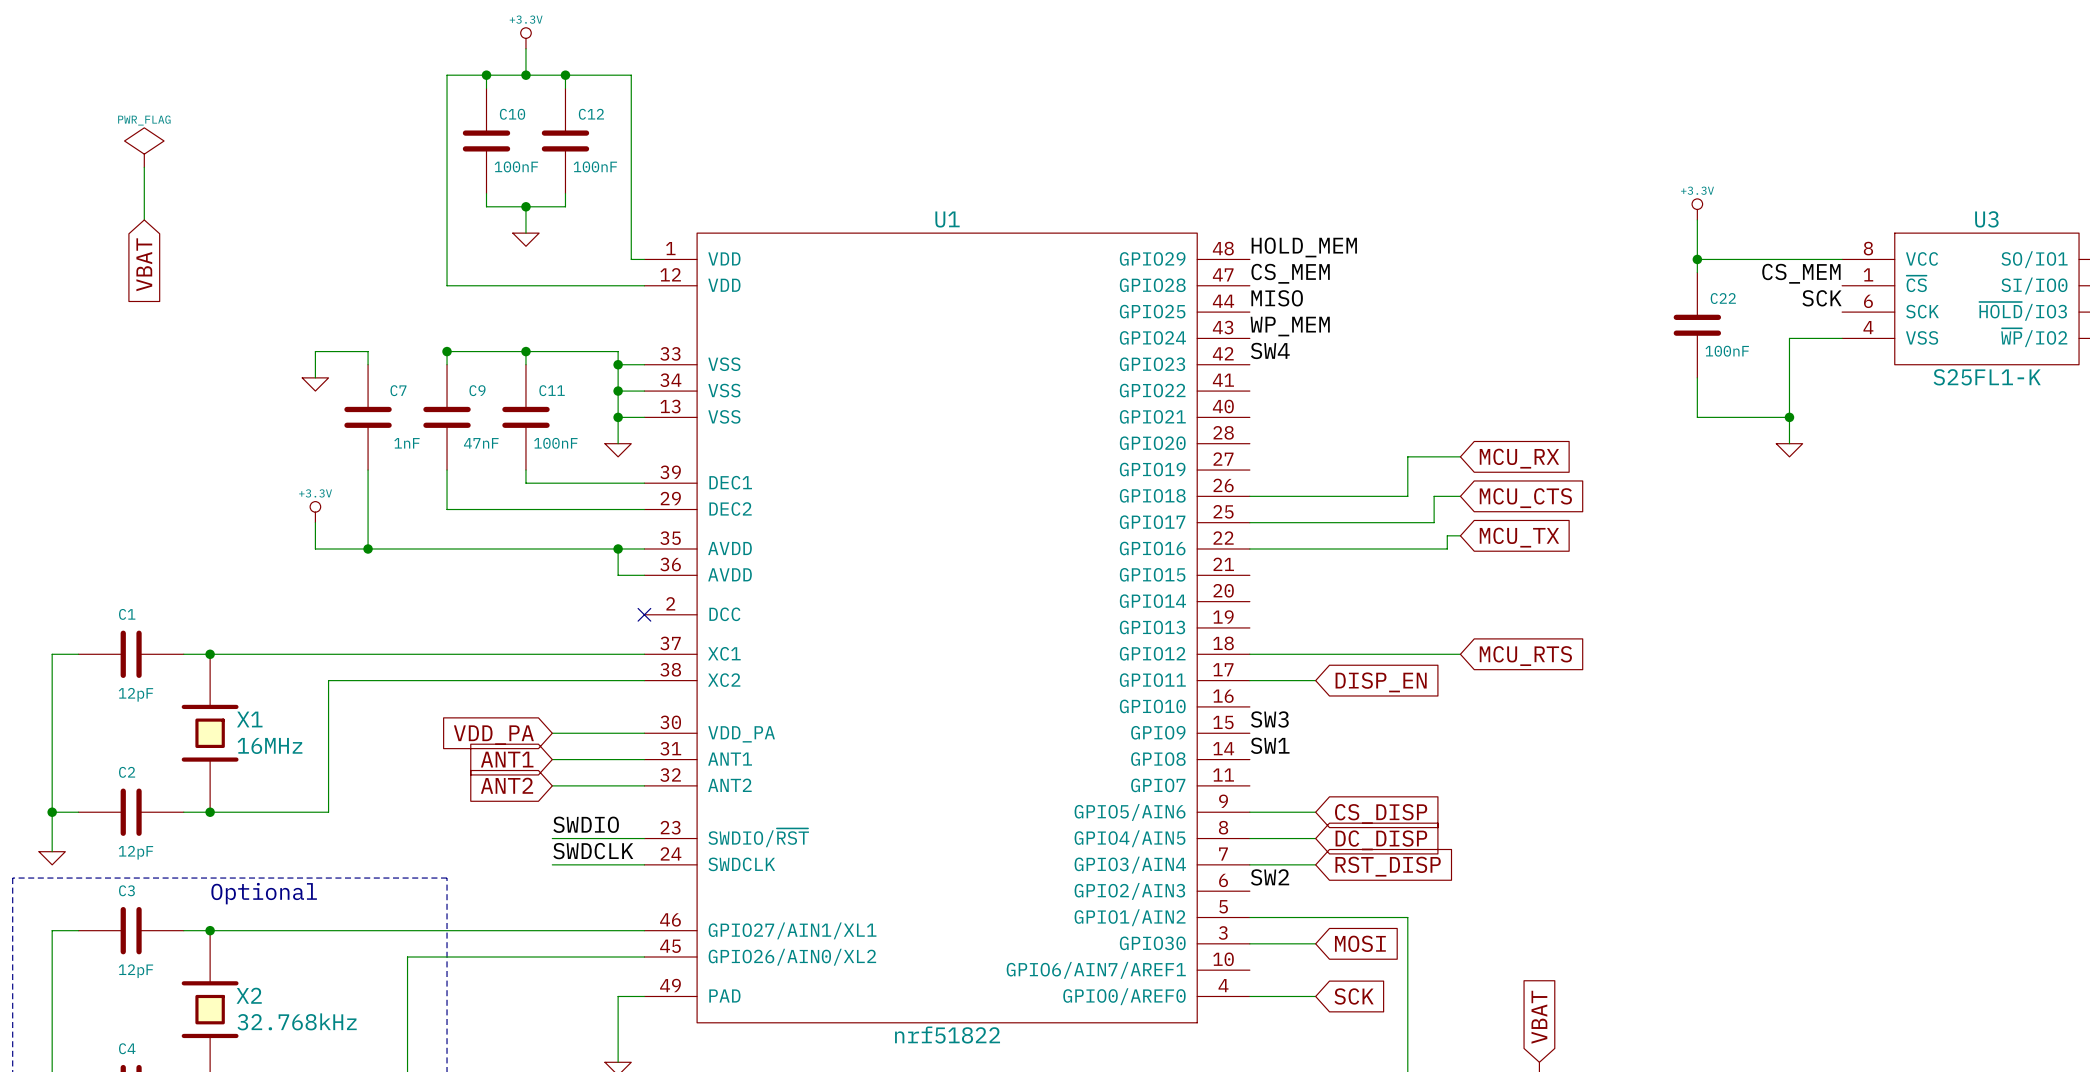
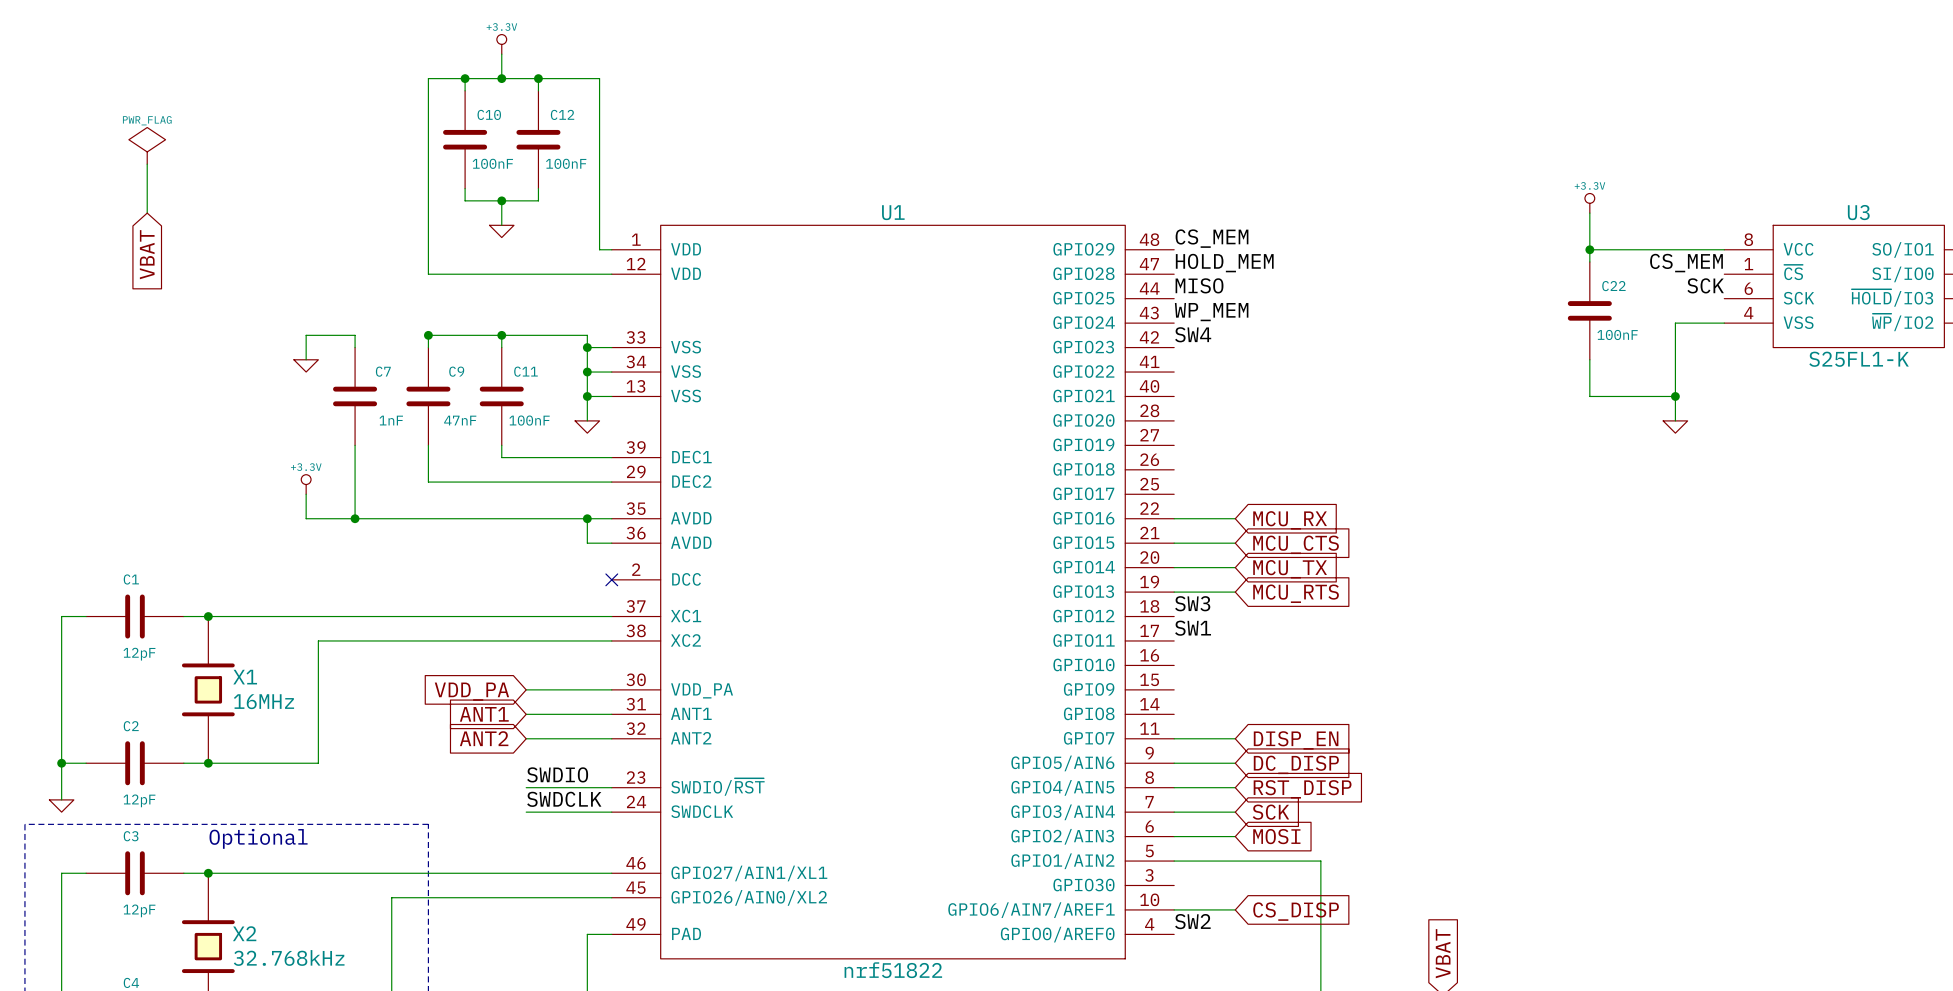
label: HOLD_MEM (1304, 247) -> CS_MEM (1212, 238)
label: CS_MEM (1290, 273) -> HOLD_MEM (1224, 263)
wire: (1460, 456) (1407, 456) (1407, 496) (1249, 496) -> none
global label position: MCU_RX (1519, 458) -> MCU_RX (1290, 520)
wire: (1460, 496) (1434, 496) (1434, 522) (1249, 522) -> none
global label position: MCU_CTS (1525, 498) -> MCU_CTS (1296, 544)
wire: (1460, 535) (1447, 535) (1447, 548) (1315, 548) -> none
global label position: MCU_TX (1519, 537) -> MCU_TX (1290, 569)
wire: none -> (1174, 543) (1235, 543)
wire: none -> (1174, 567) (1235, 567)
wire: (1249, 654) (1460, 654) -> none
global label position: MCU_RTS (1525, 656) -> MCU_RTS (1296, 593)
wire: (1249, 680) (1315, 680) -> (1174, 592) (1235, 592)
global label position: DISP_EN (1381, 682) -> DISP_EN (1296, 740)
label position: SW3 (1269, 719) -> SW3 (1192, 603)
label position: SW1 (1270, 745) -> SW1 (1193, 628)
wire: none -> (1174, 738) (1235, 738)
global label: CS_DISP (1381, 814) -> DC_DISP (1296, 764)
global label: DC_DISP (1381, 840) -> RST_DISP (1302, 789)
global label: RST_DISP (1388, 866) -> SCK (1270, 812)
label position: SW2 (1270, 877) -> SW2 (1192, 921)
wire: (1249, 943) (1315, 943) -> (1174, 836) (1235, 836)
global label position: MOSI (1360, 943) -> MOSI (1276, 836)
global label: none -> CS_DISP (1296, 911)
wire: (1249, 996) (1315, 996) -> (1174, 909) (1235, 909)
global label: SCK (1354, 996) -> none

